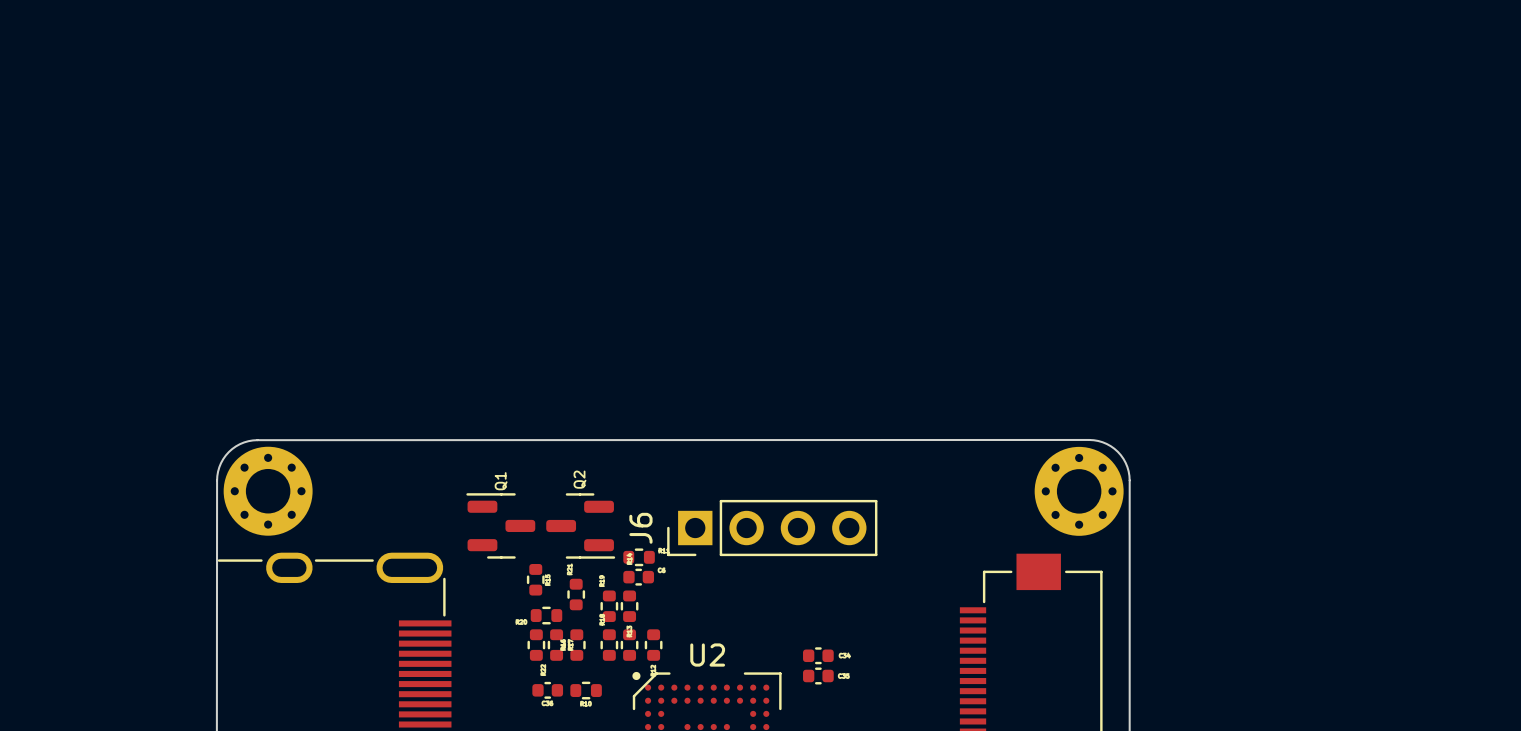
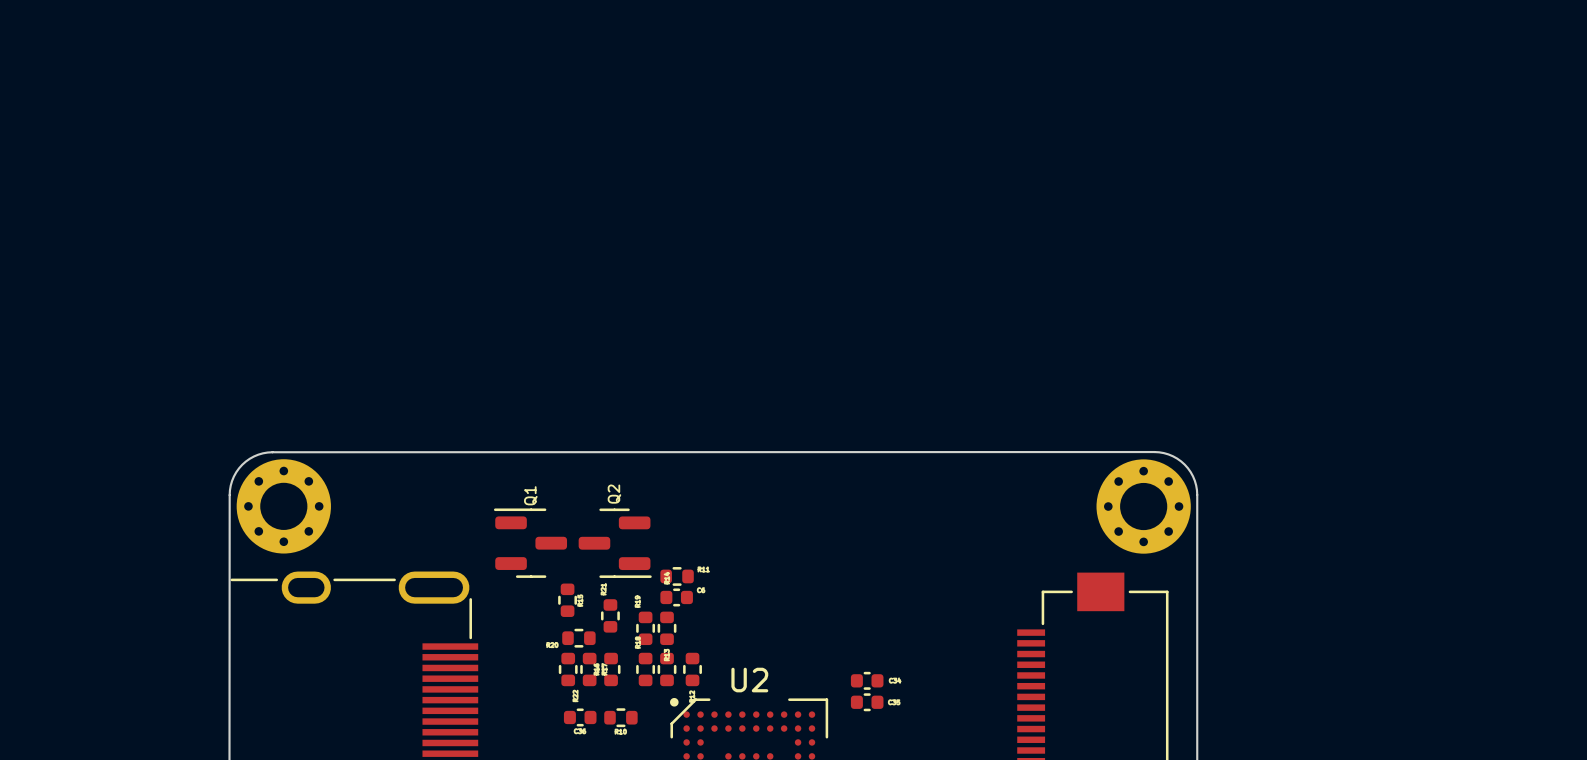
J6: (772, 528) -> none

